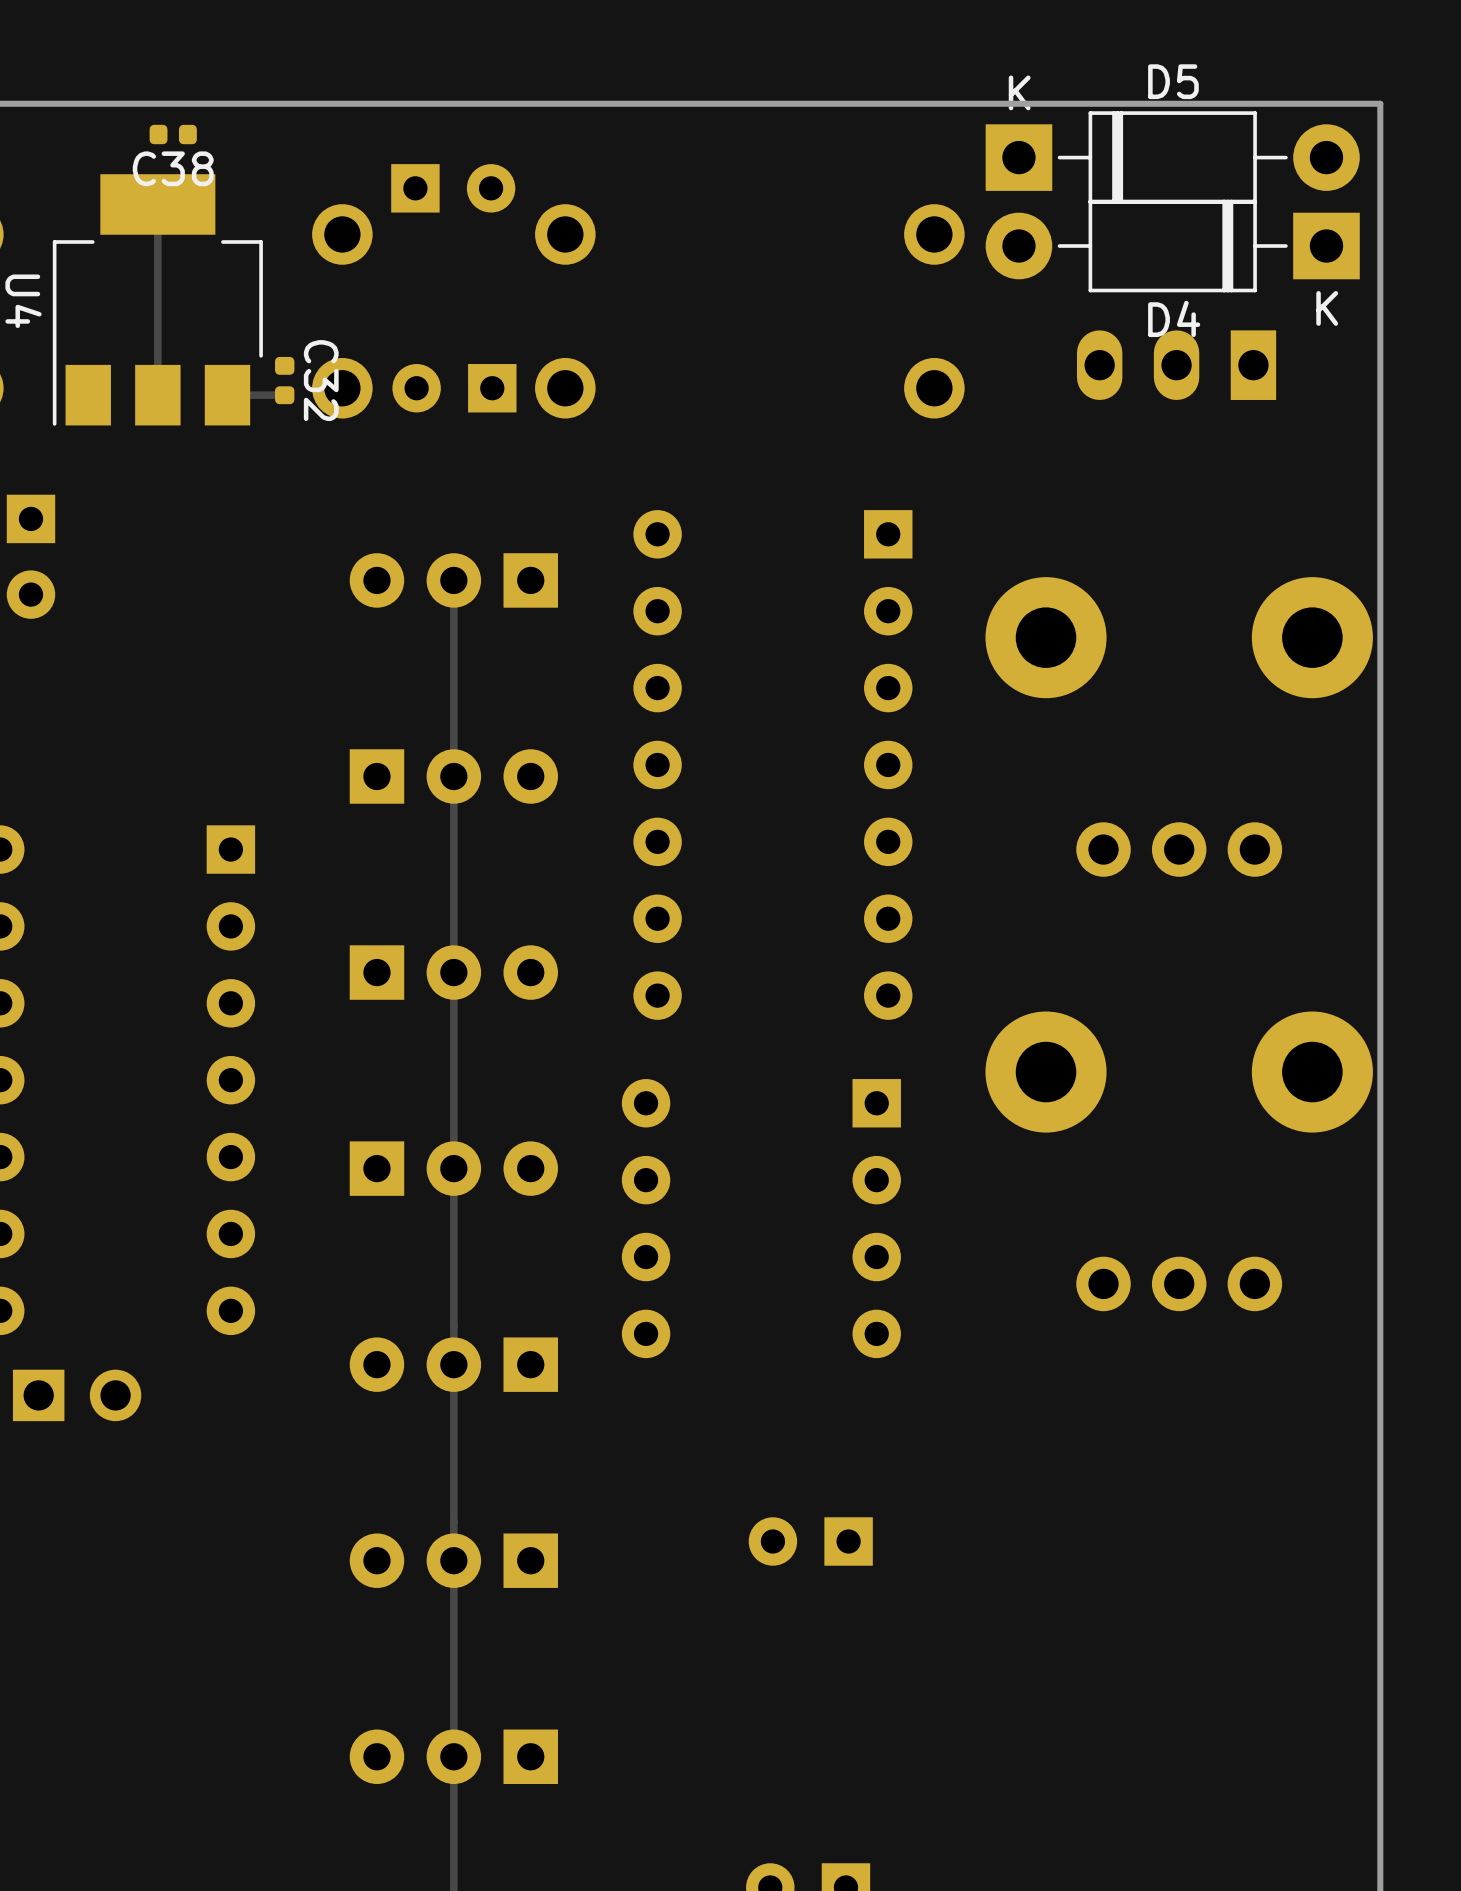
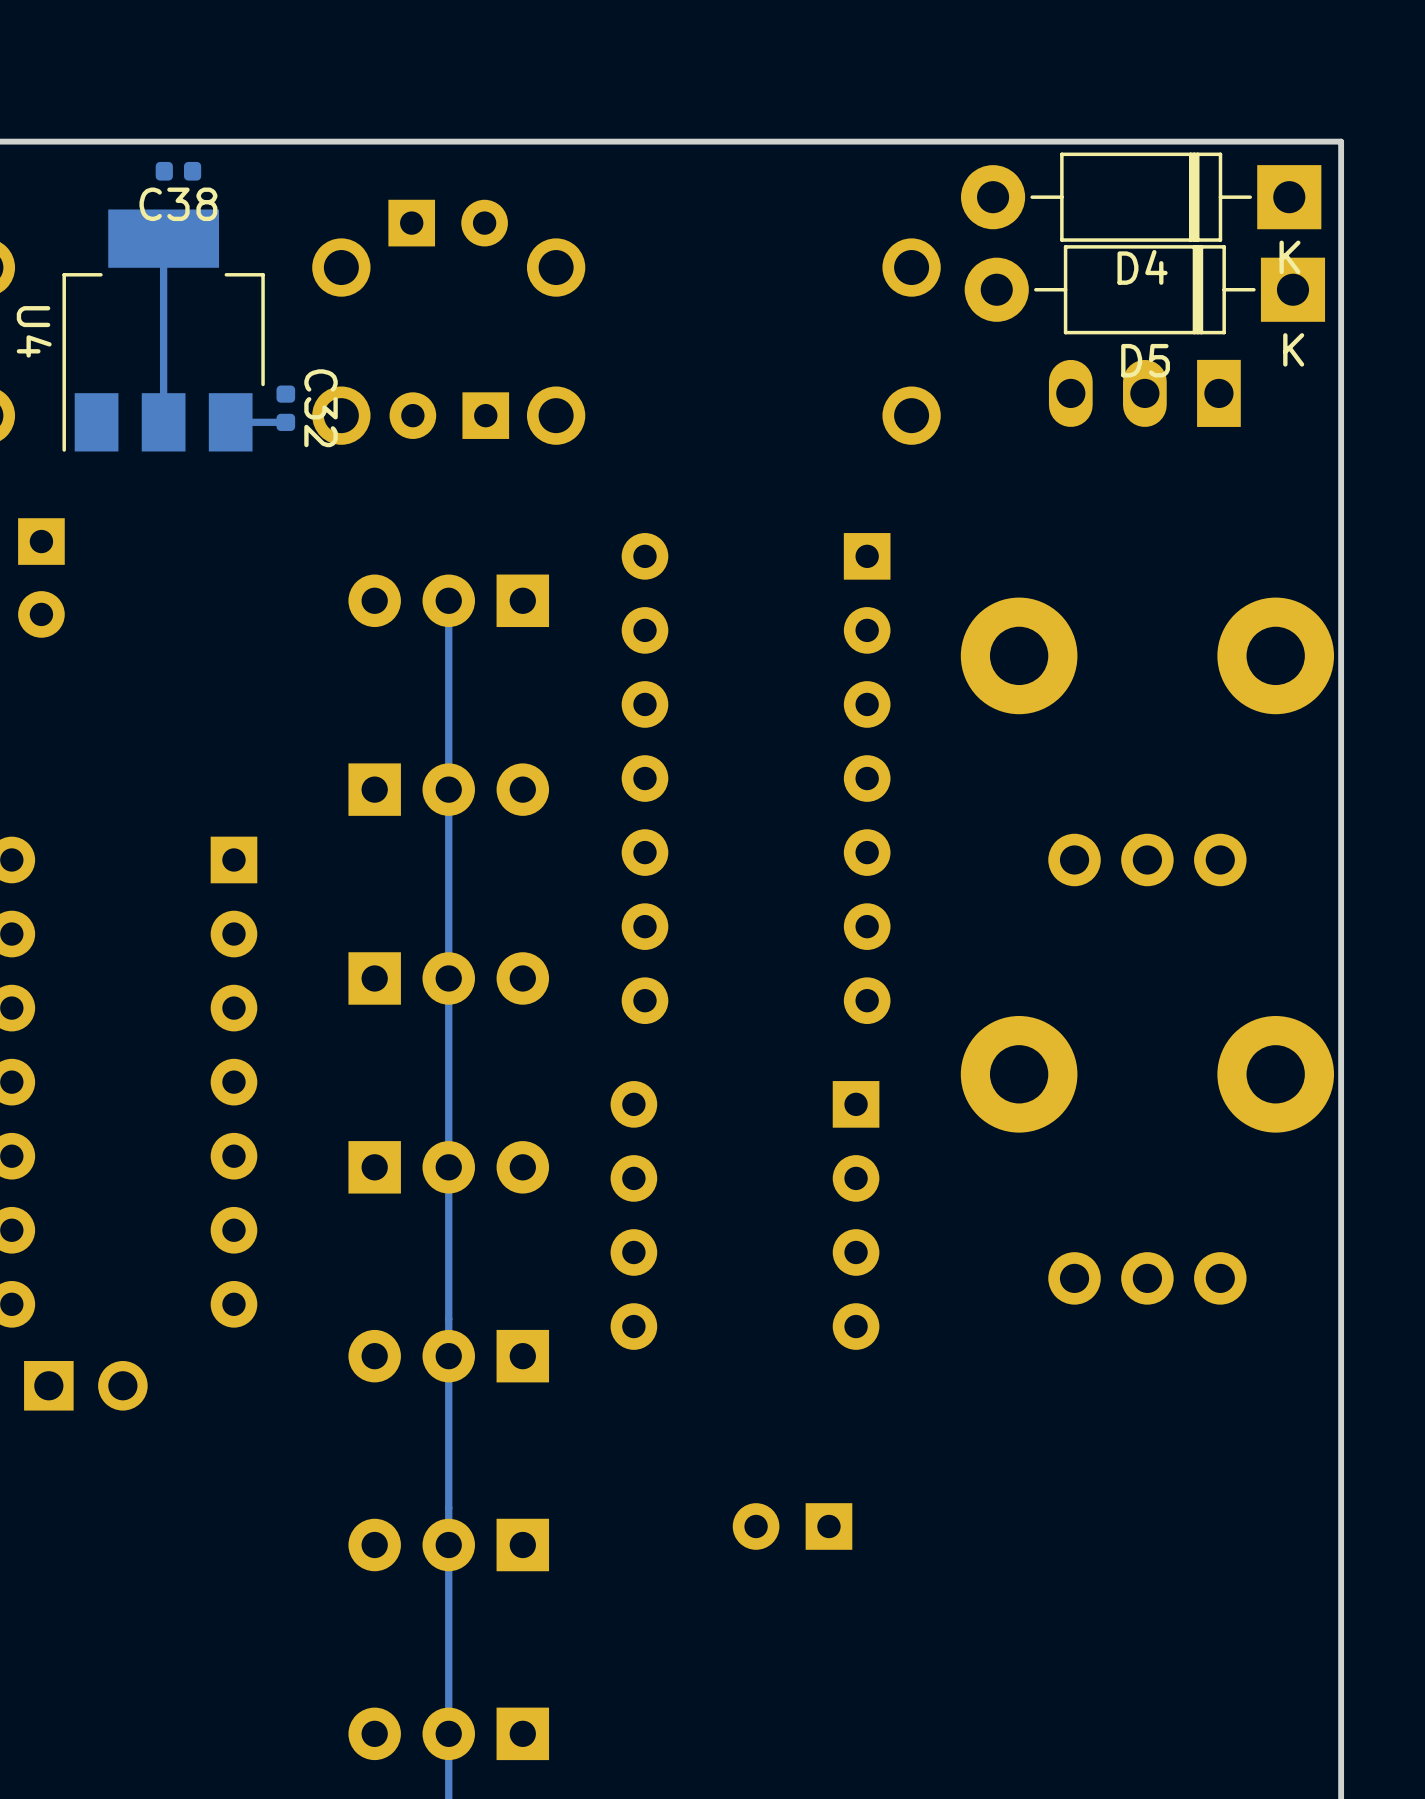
D5 rotation: 0° (1172, 157) -> 180° (1144, 289)
D4 position: (1172, 246) -> (1141, 197)

